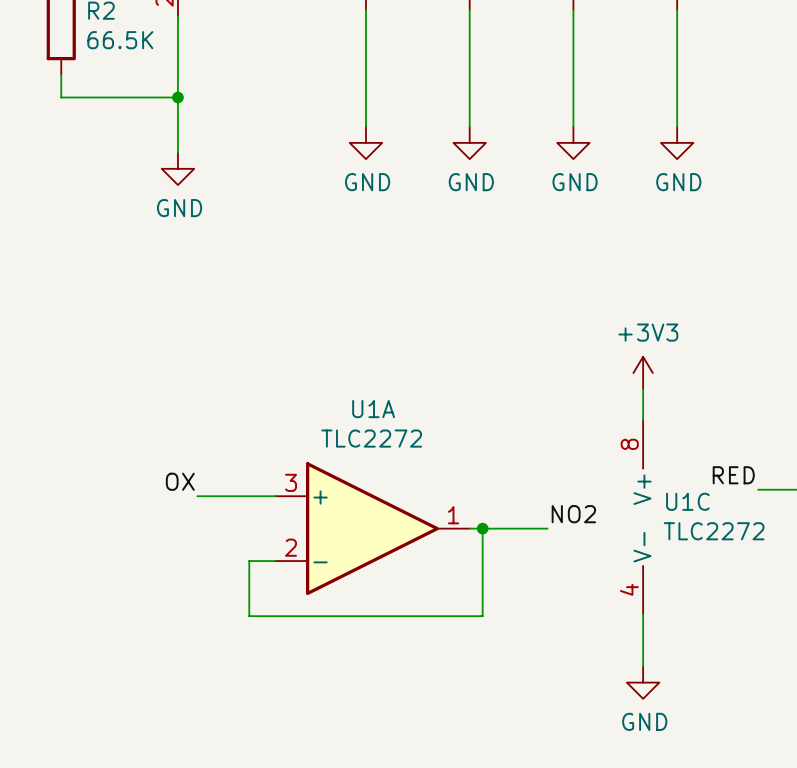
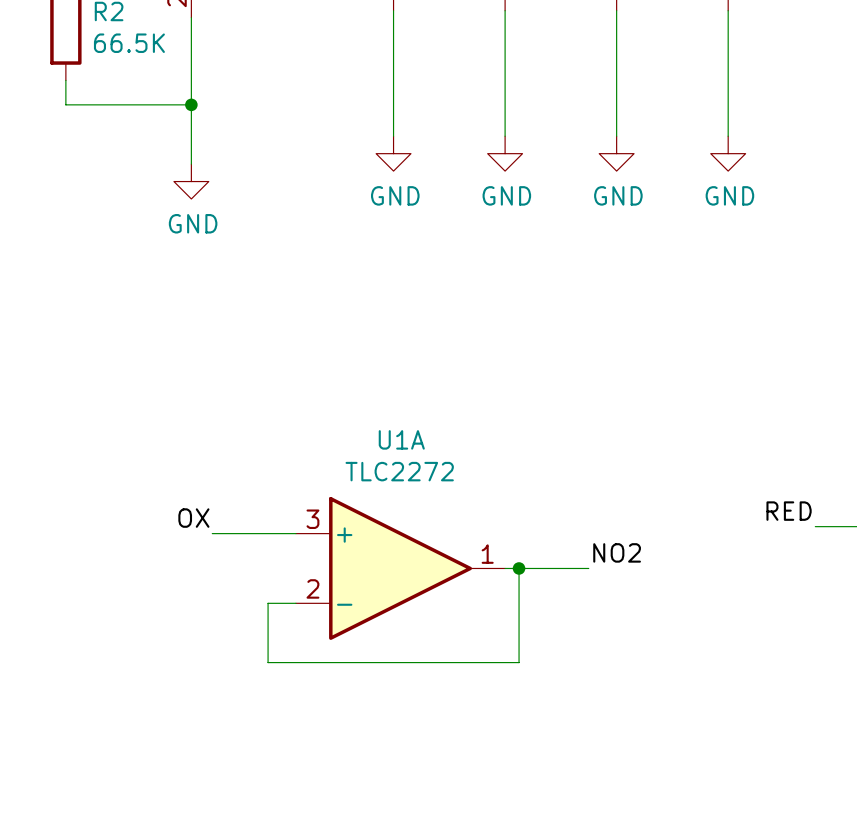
power symbol: +3V3 (643, 373) -> none
wire: (643, 389) (643, 420) -> none
U1C: TLC2272 (643, 517) -> none
wire: (643, 614) (643, 666) -> none
power symbol: GND (643, 682) -> none

